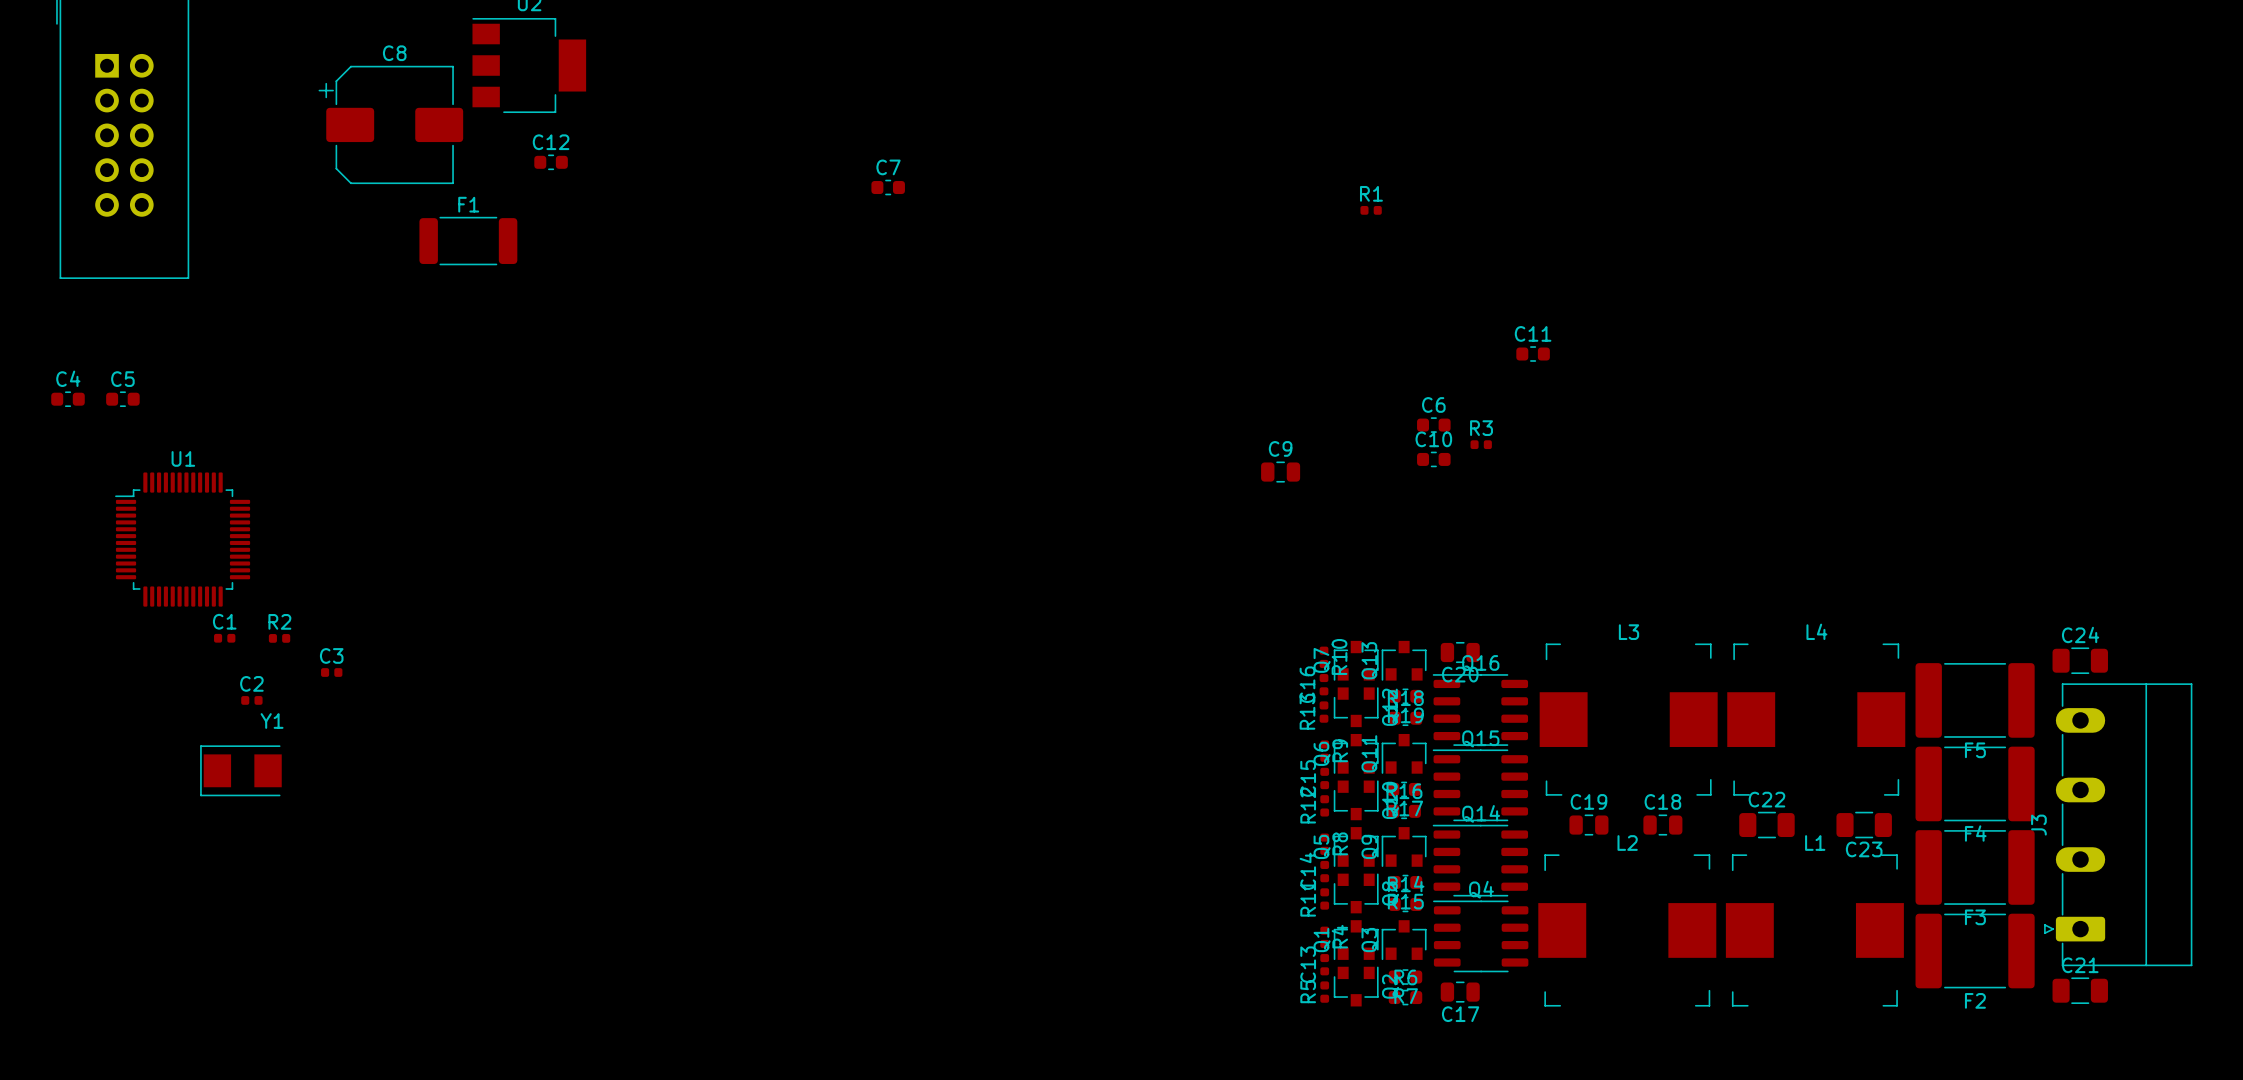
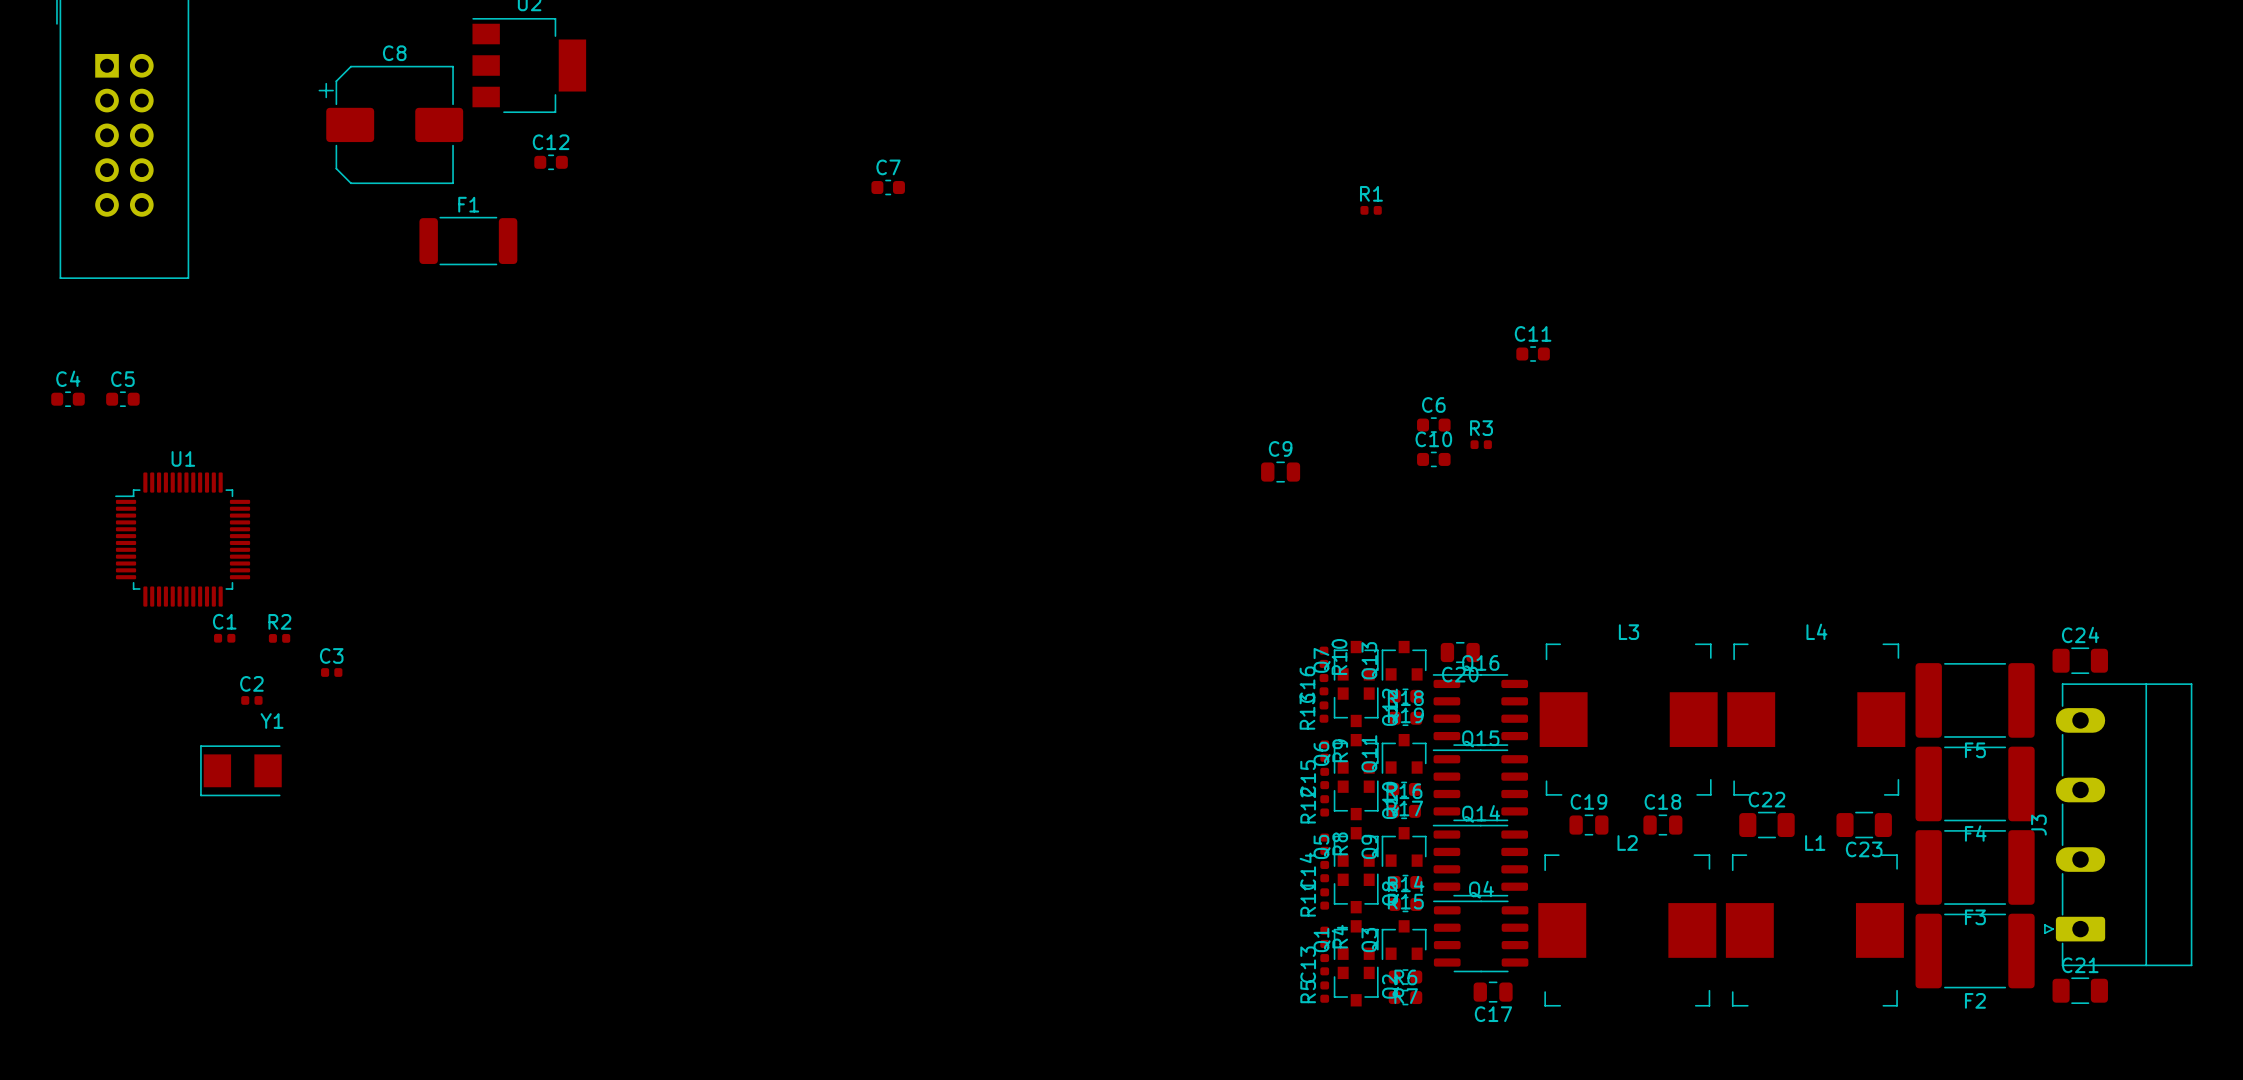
C17 position: (1460, 992) -> (1493, 992)

